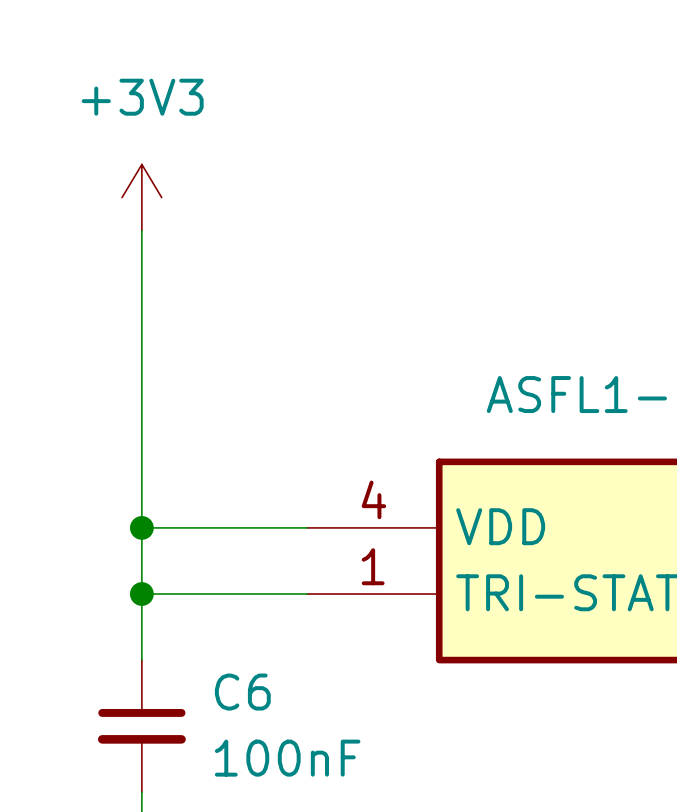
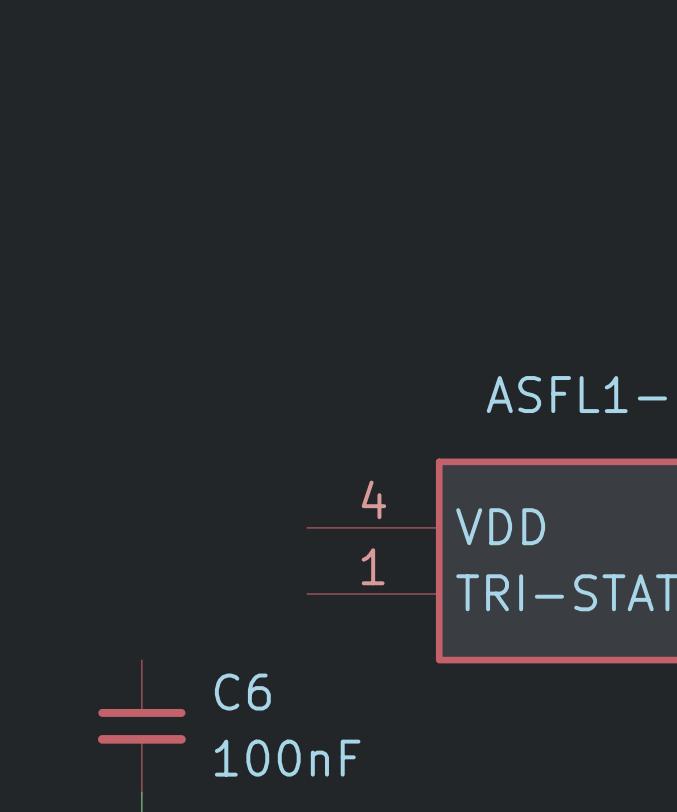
power symbol: +3V3 (141, 197) -> none
wire: (141, 230) (141, 660) -> none
wire: (141, 527) (307, 527) -> none
junction: (141, 527) -> none
wire: (141, 594) (307, 594) -> none
junction: (141, 594) -> none

